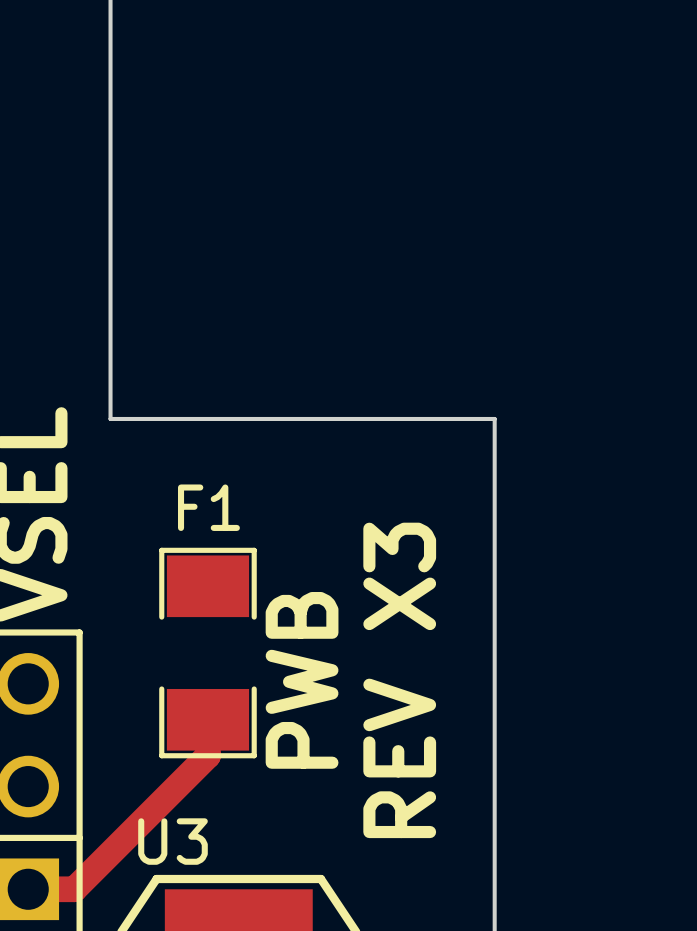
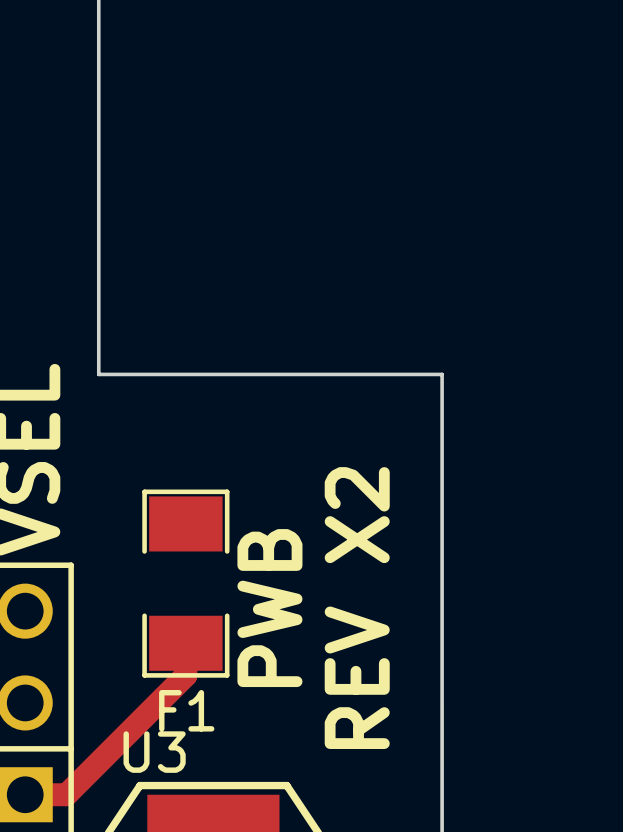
F1 name position: F1 (208, 507) -> F1 (186, 710)
text: REV X3 (399, 680) -> REV X2 (357, 608)

